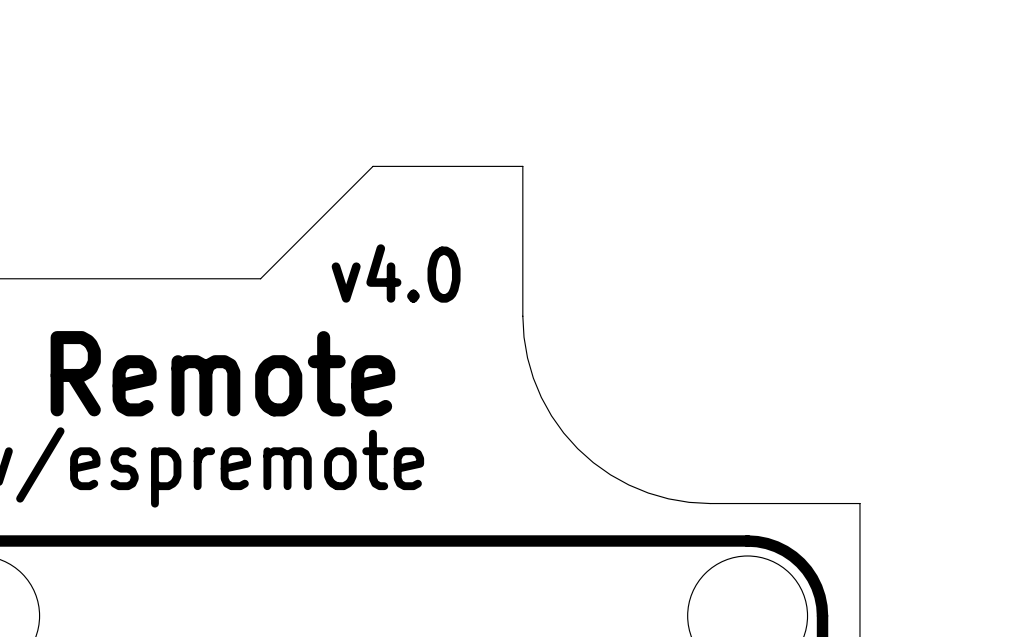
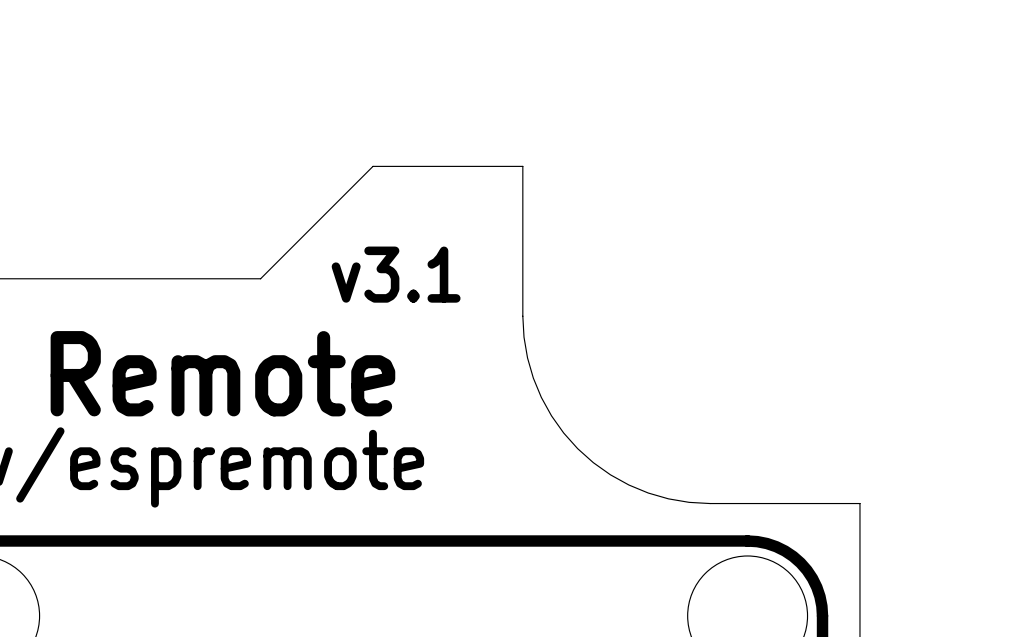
text: v4.0 (396, 273) -> v3.1 (396, 274)

